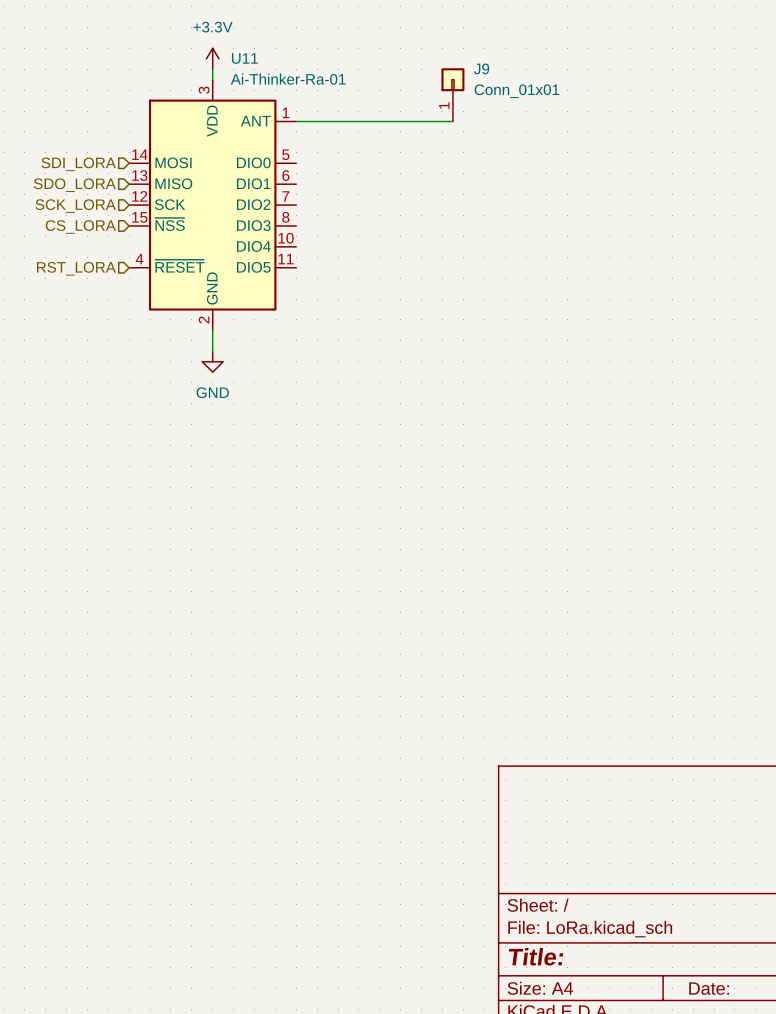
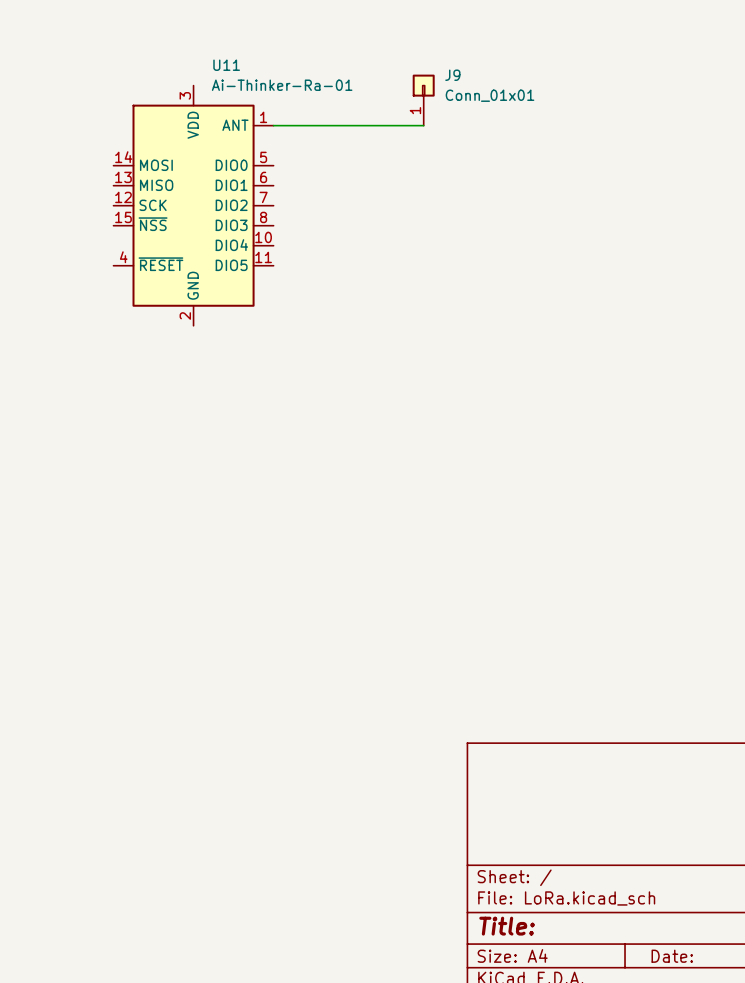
power symbol: +3.3V (212, 58) -> none
wire: (212, 69) (212, 79) -> none
hierarchical label: SDI_LORA (78, 164) -> none
hierarchical label: SDO_LORA (74, 185) -> none
hierarchical label: SCK_LORA (75, 206) -> none
hierarchical label: CS_LORA (80, 227) -> none
hierarchical label: RST_LORA (76, 268) -> none
wire: (212, 330) (212, 351) -> none
power symbol: GND (212, 361) -> none

